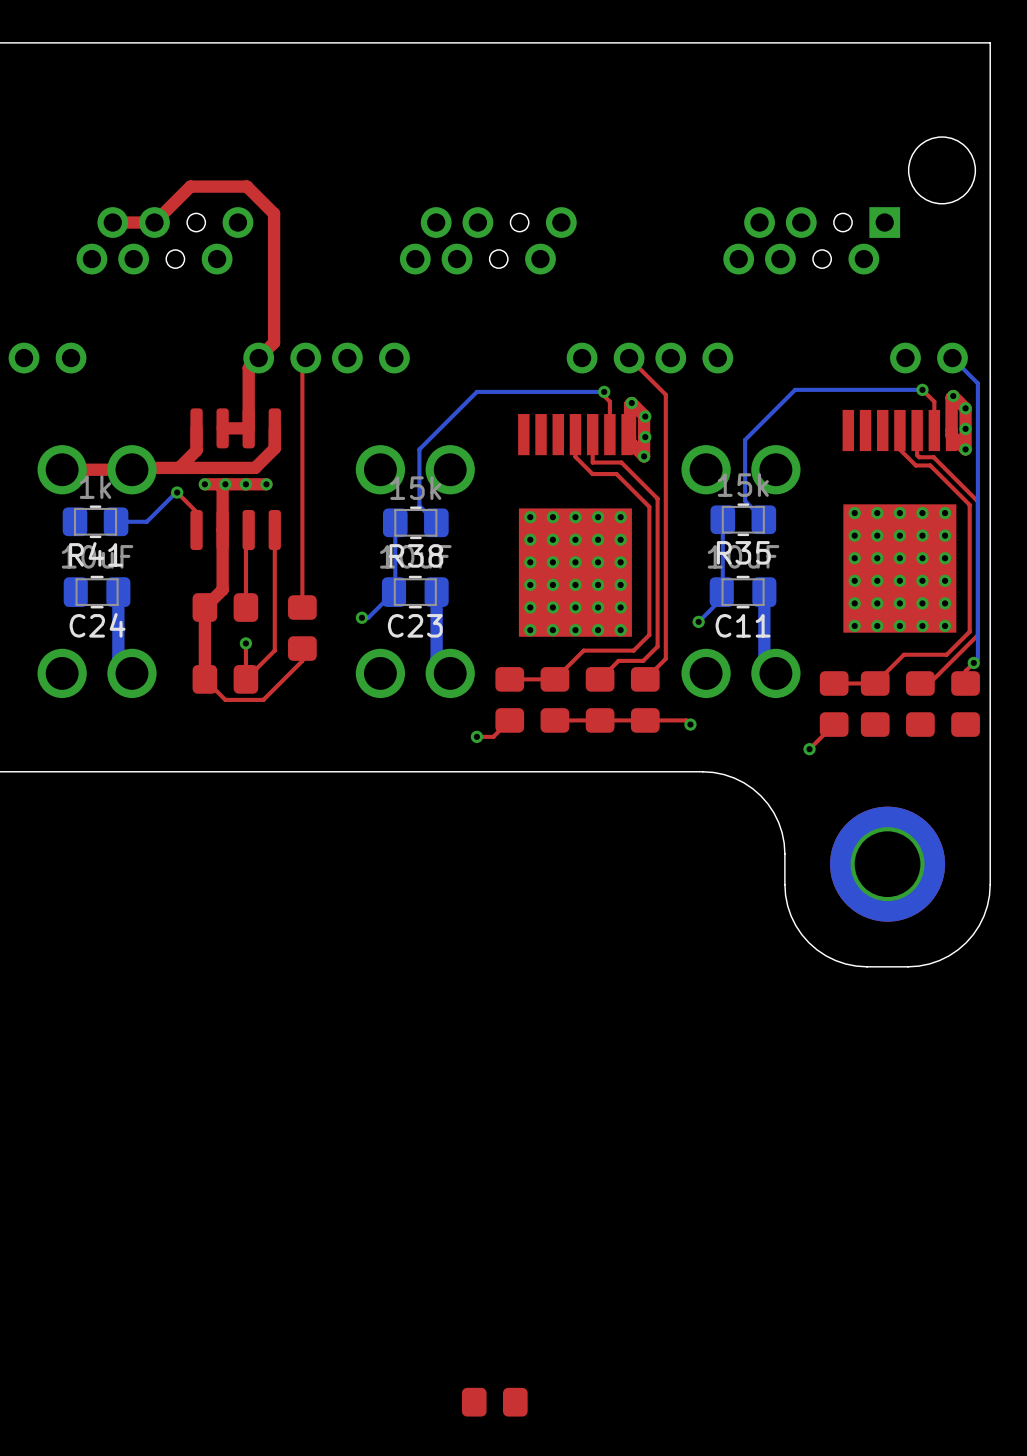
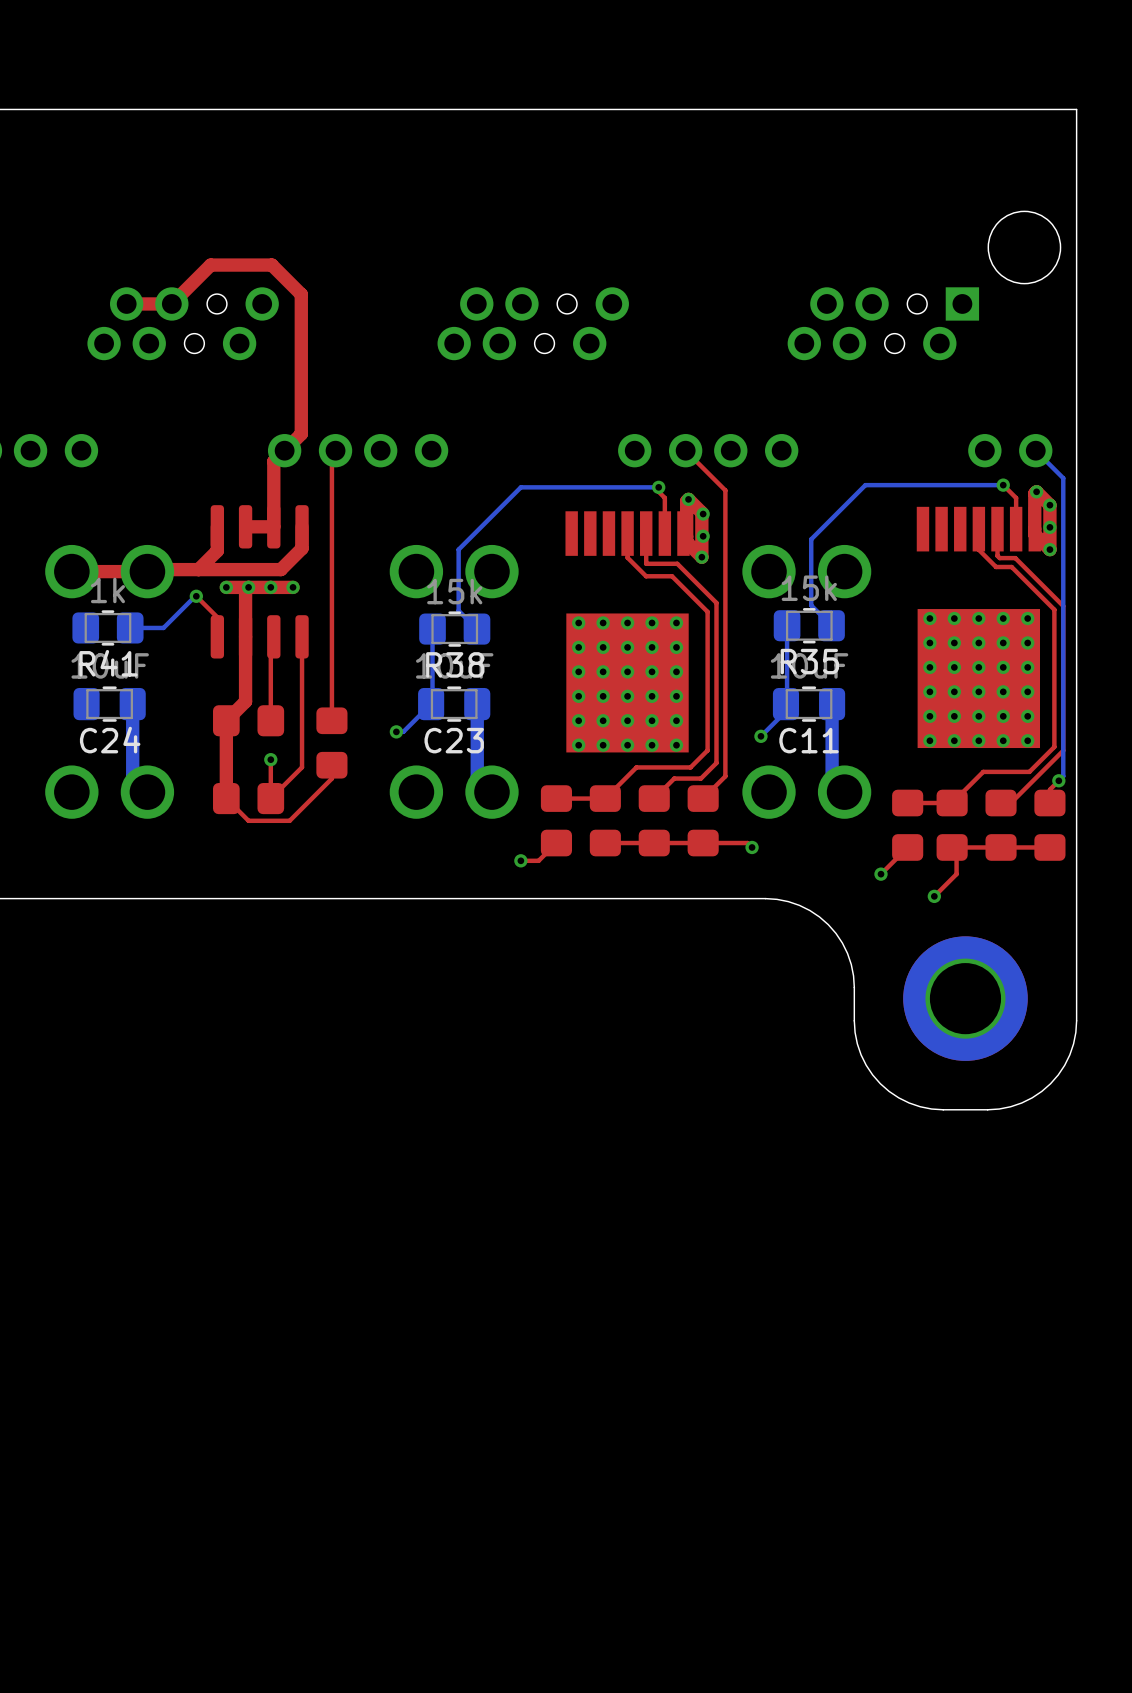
top track: none -> (1049, 847) (956, 847) (956, 874) (934, 896)
via: none -> (934, 896)
part: (494, 1402) -> none

